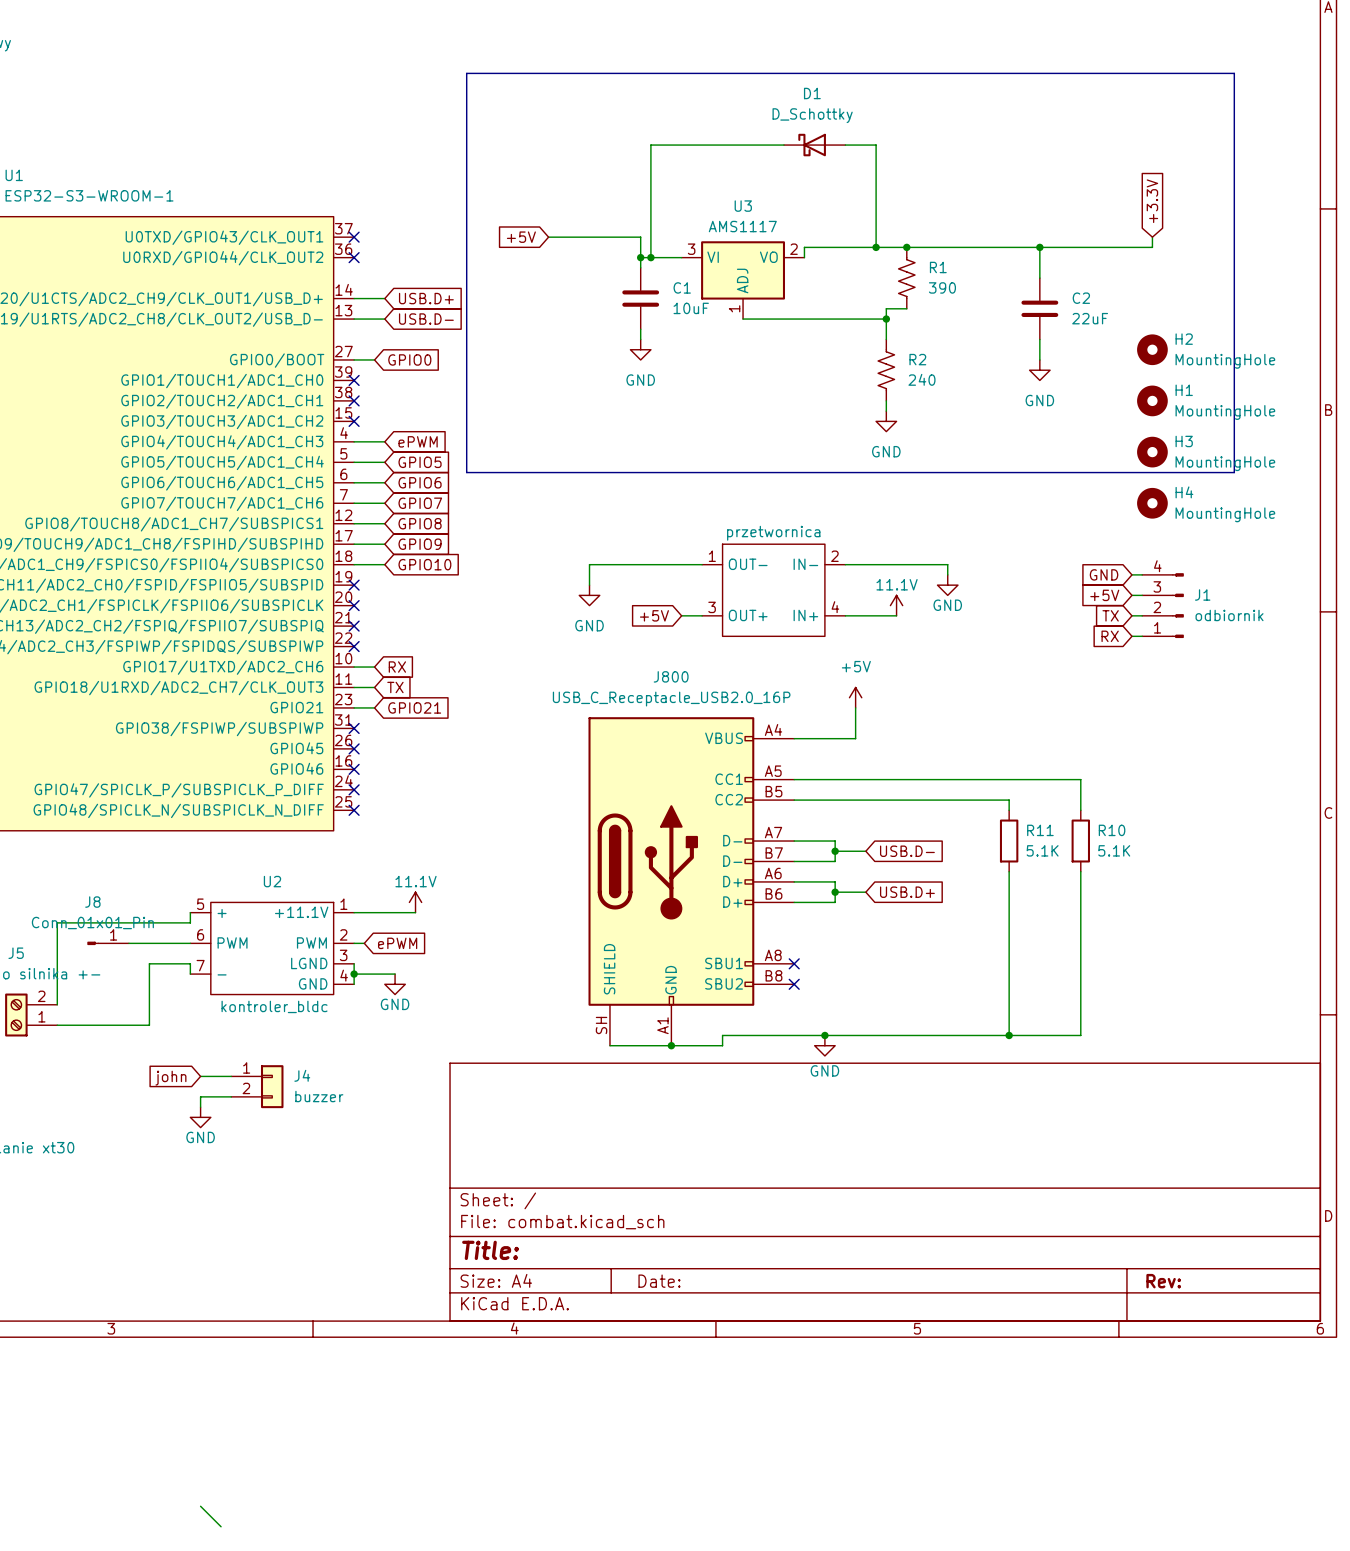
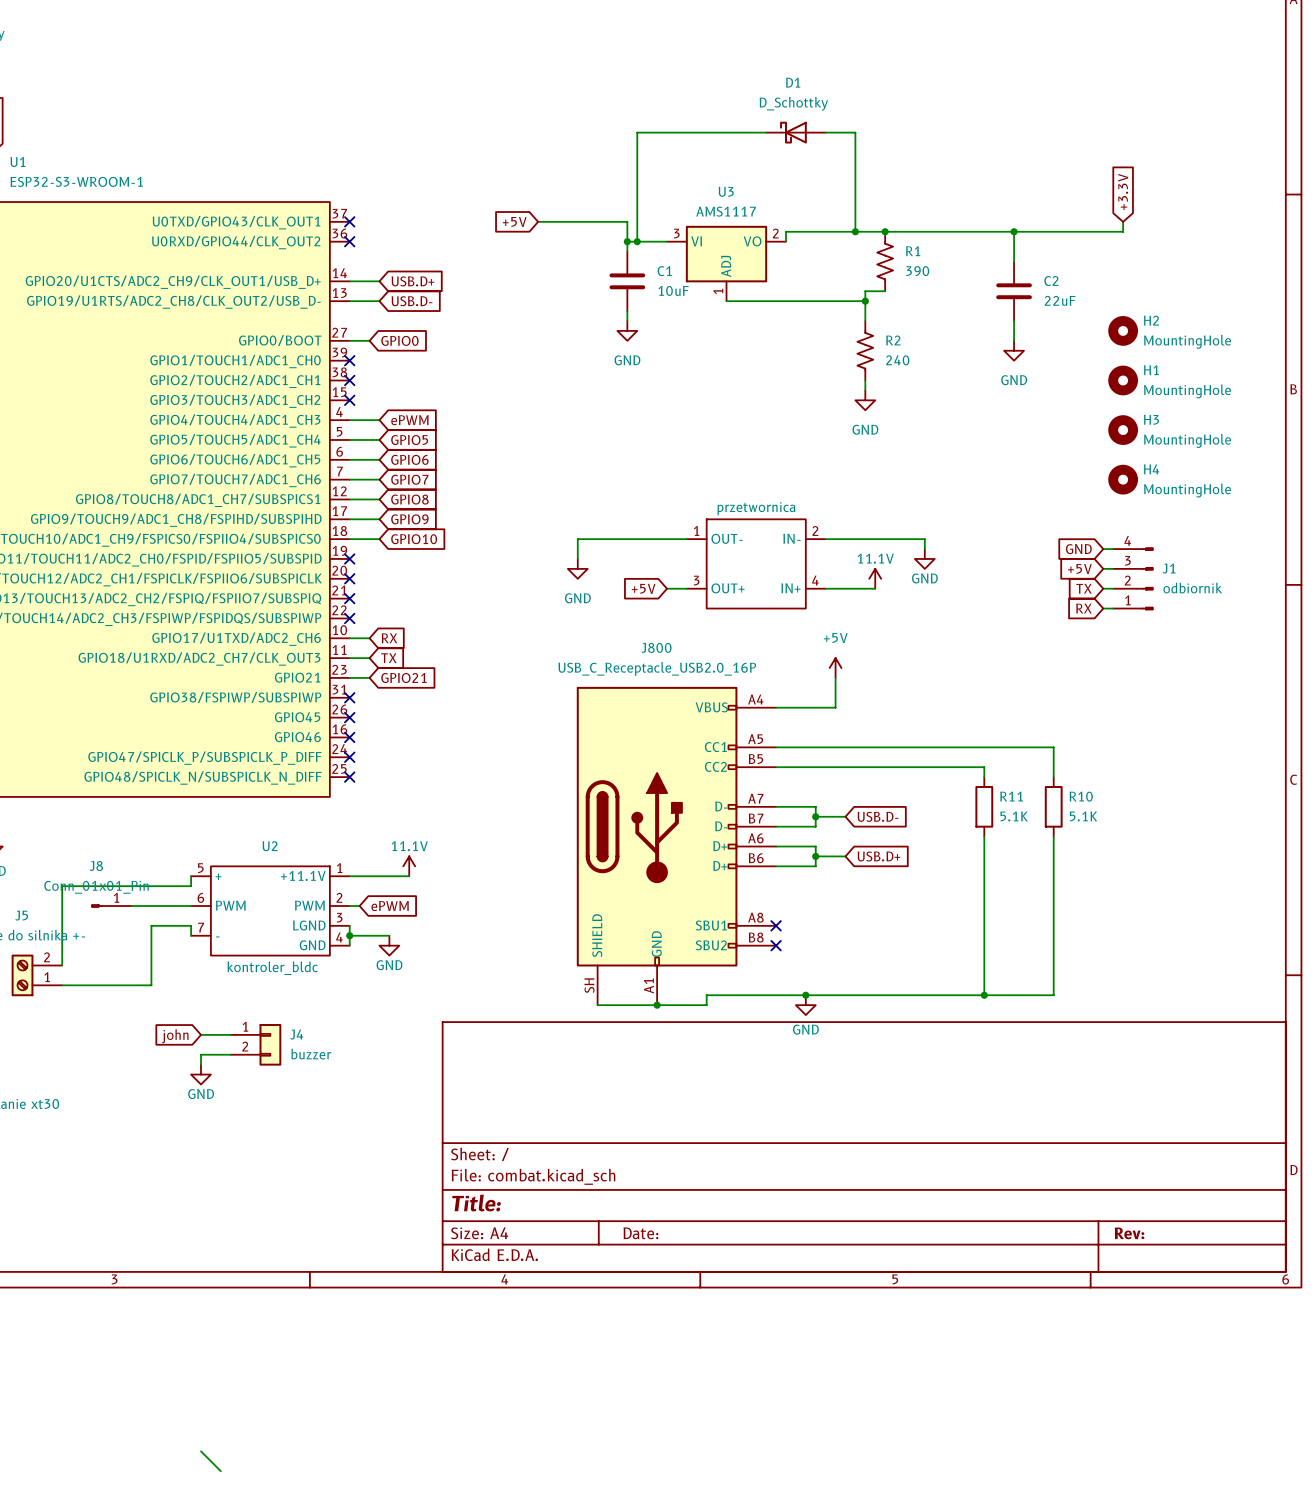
line: (466, 73) (1234, 73) (1234, 472) (466, 472) (466, 73) -> none

